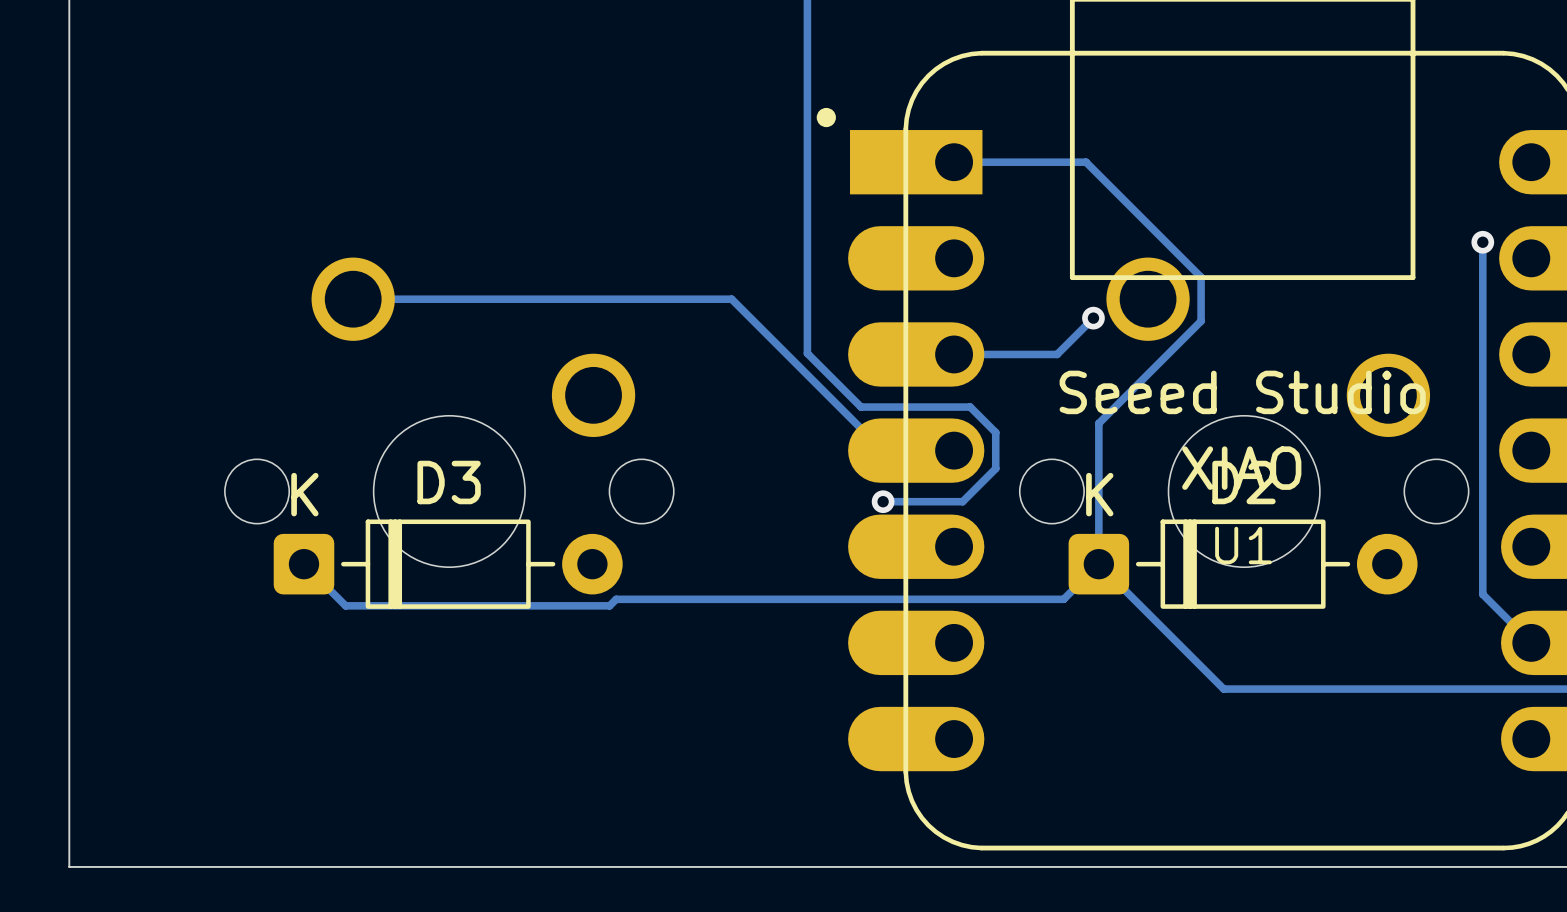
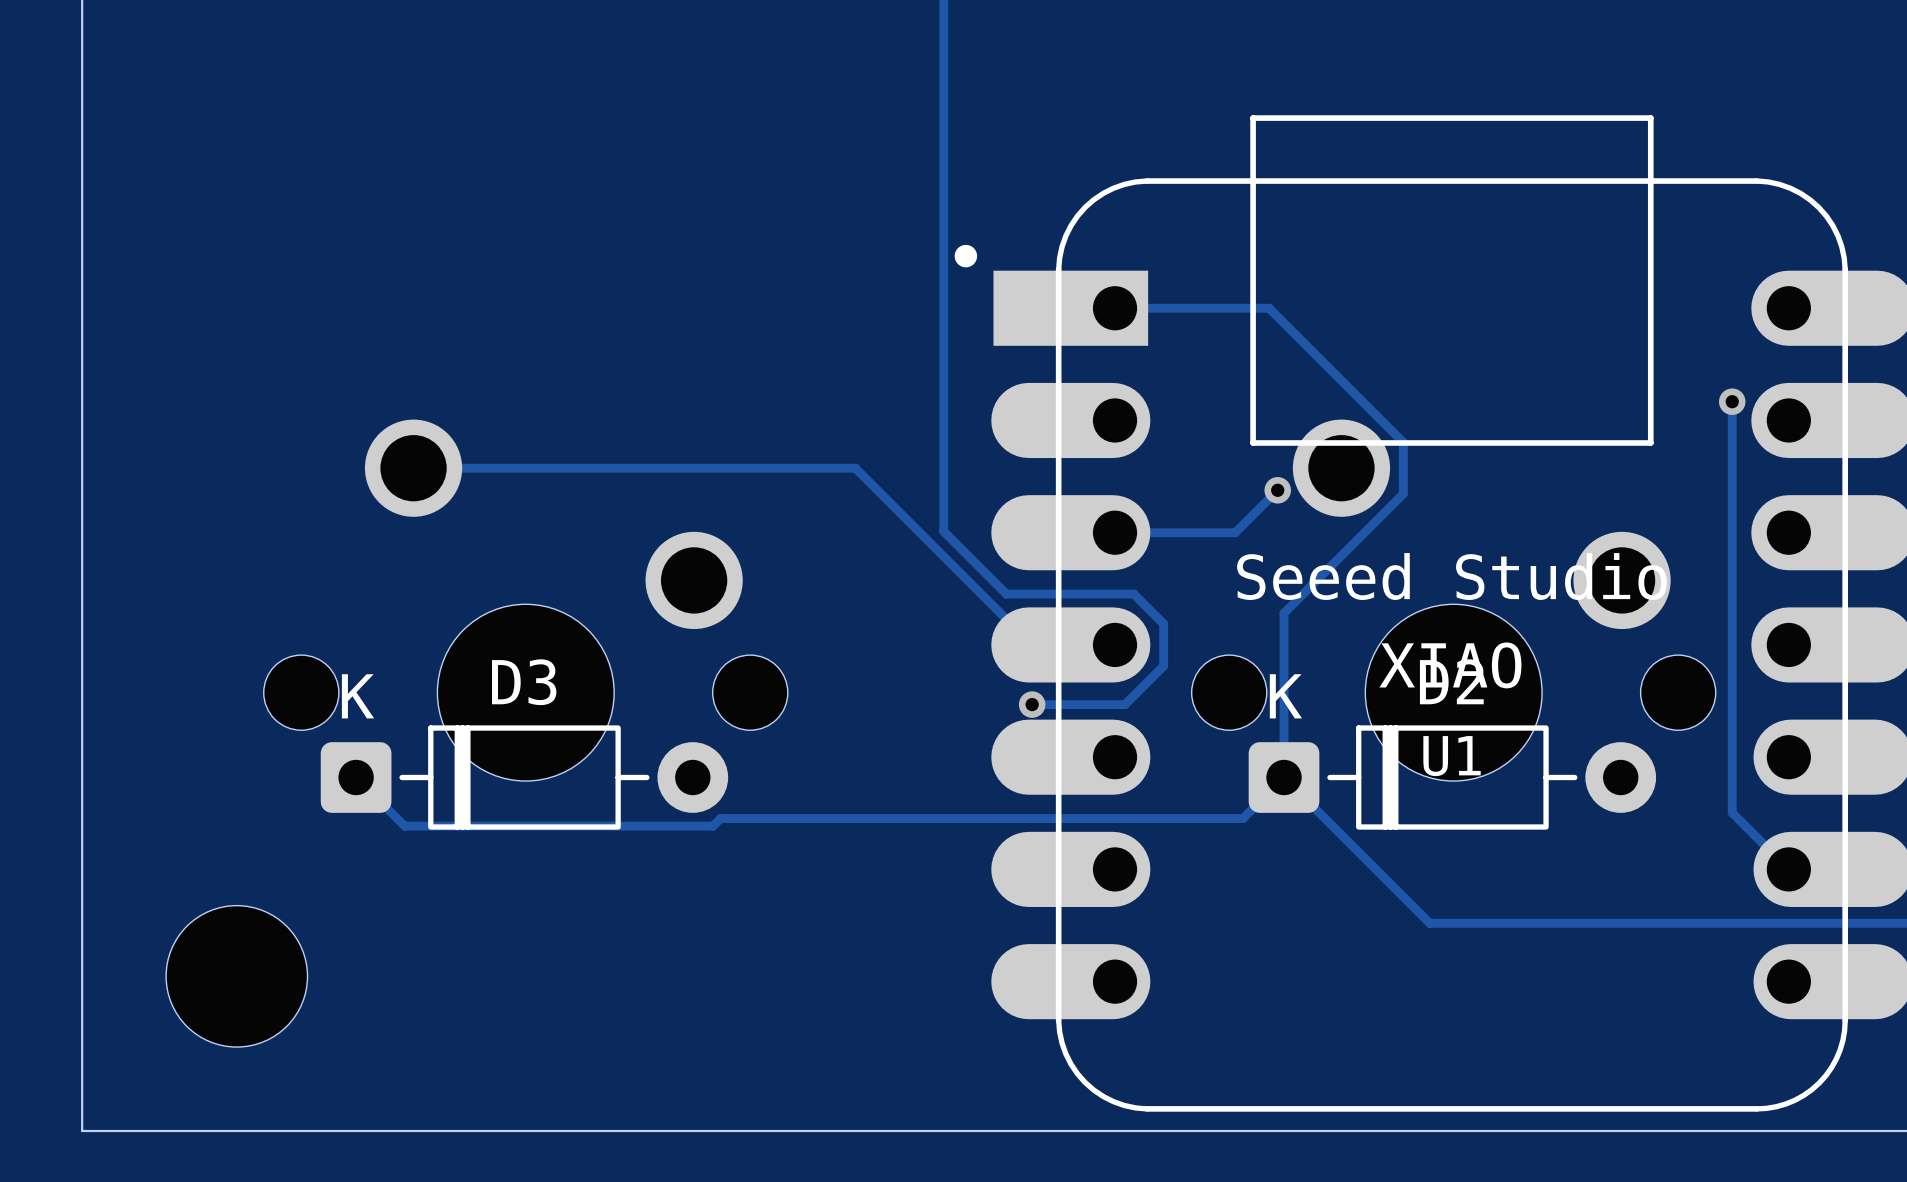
part: none -> (236, 976)

